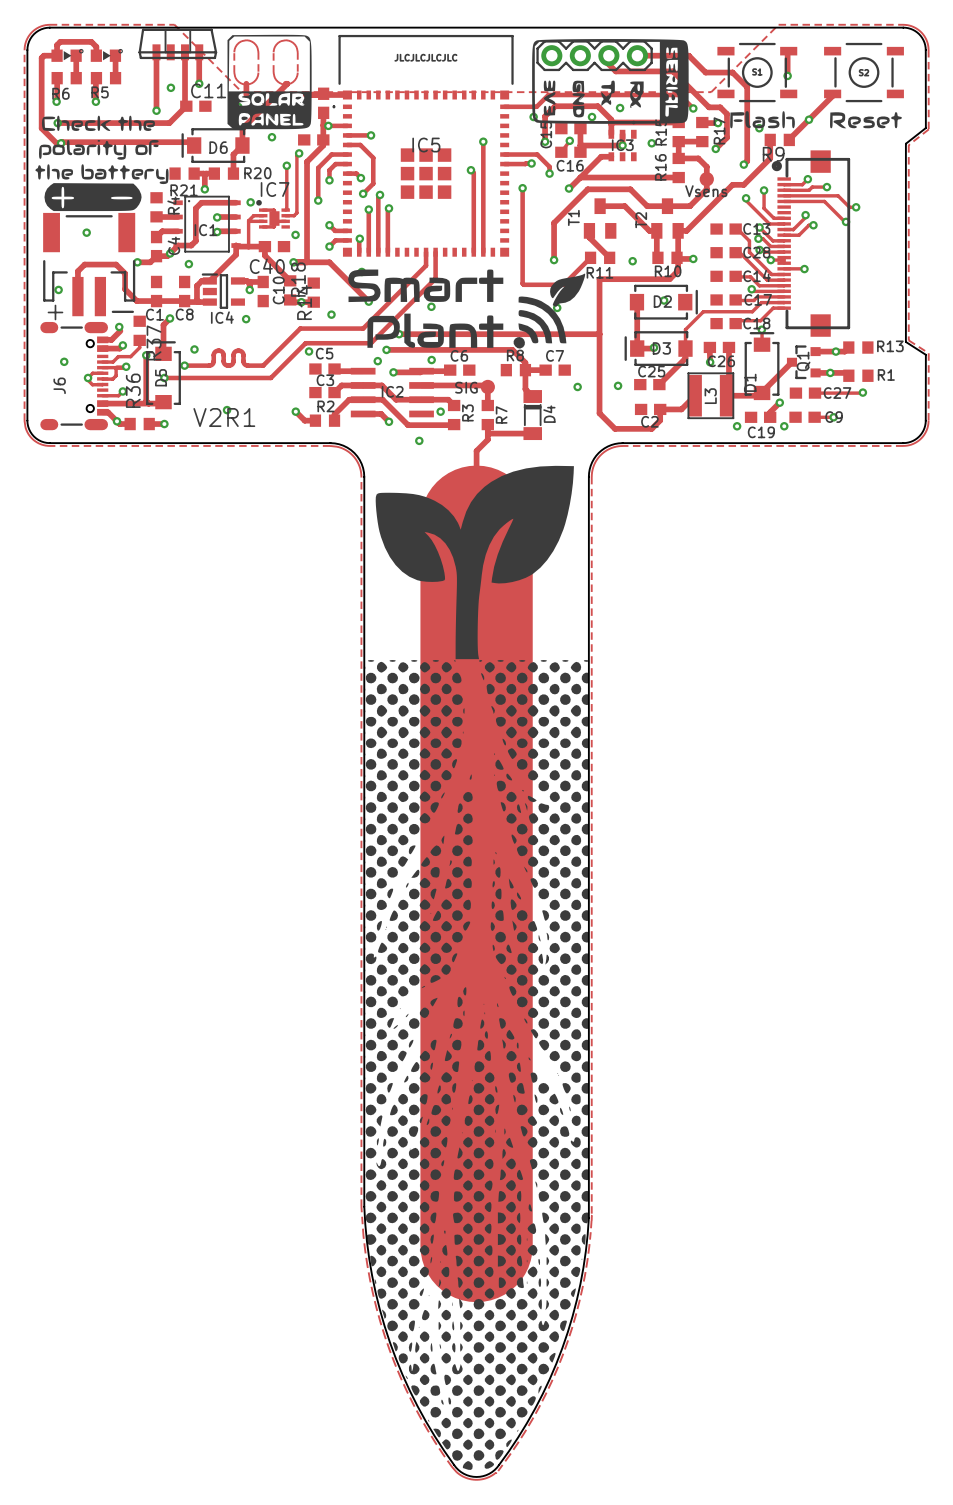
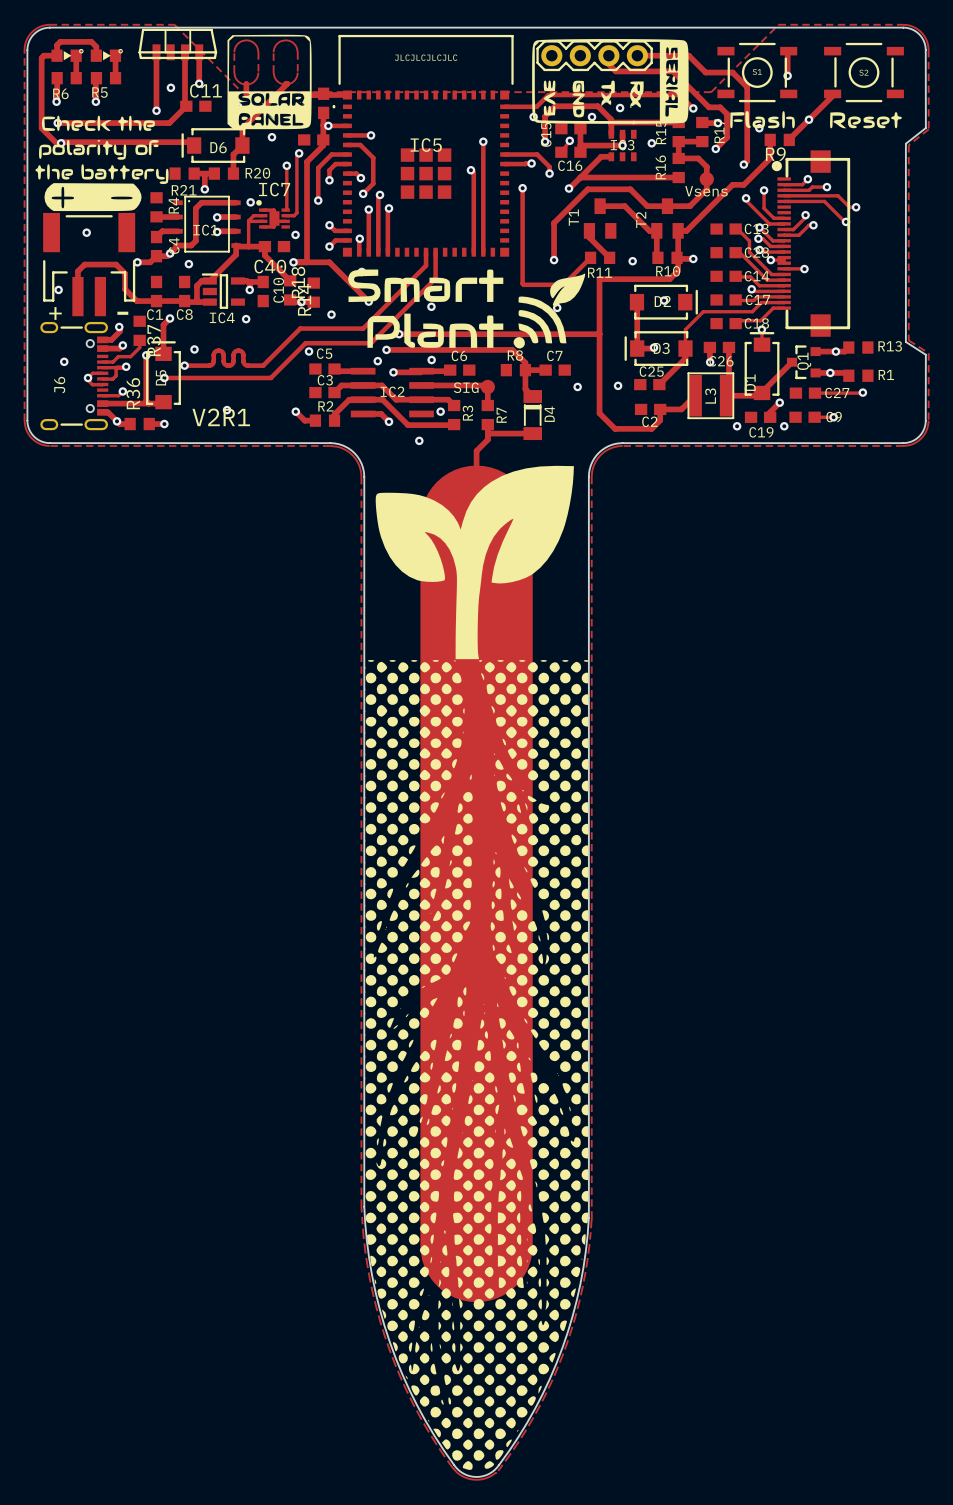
J6 footprint: [40, 321, 109, 431] -> [40, 321, 109, 431]

